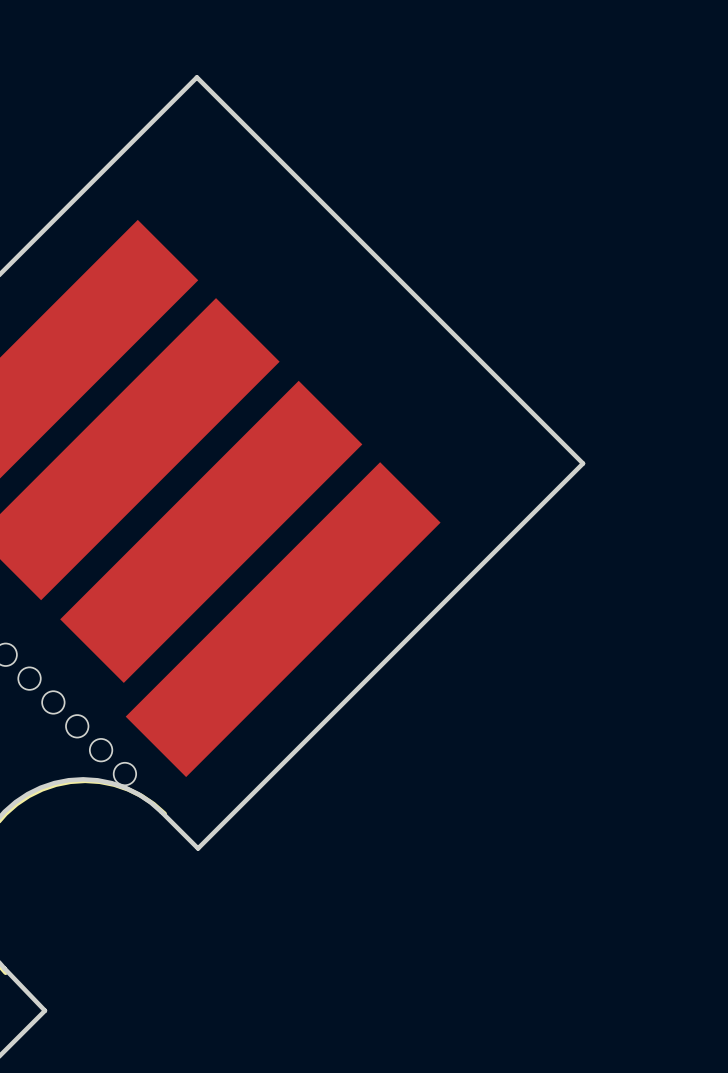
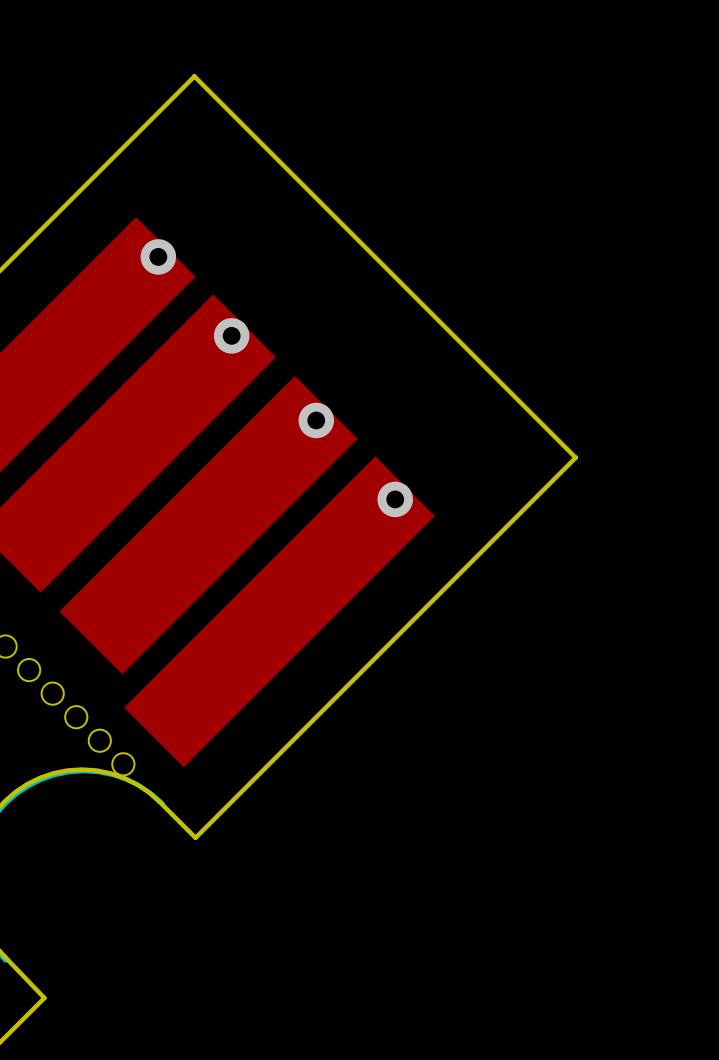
via: none -> (158, 256)
via: none -> (231, 335)
via: none -> (316, 420)
via: none -> (395, 499)

